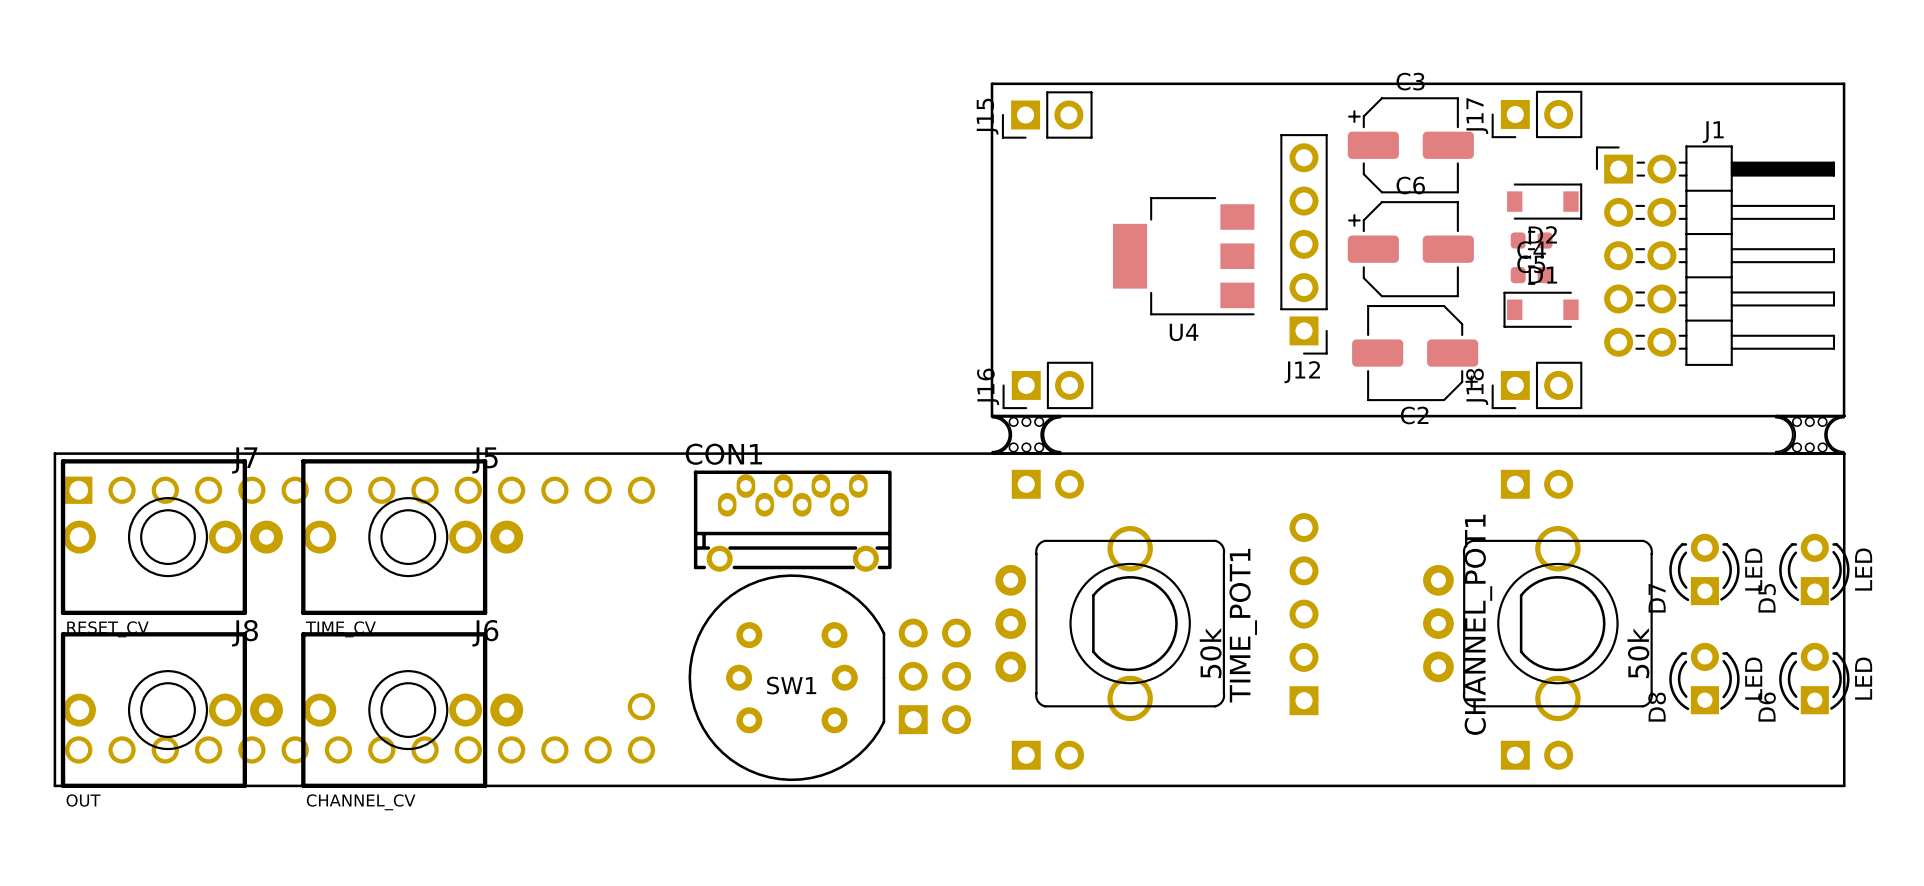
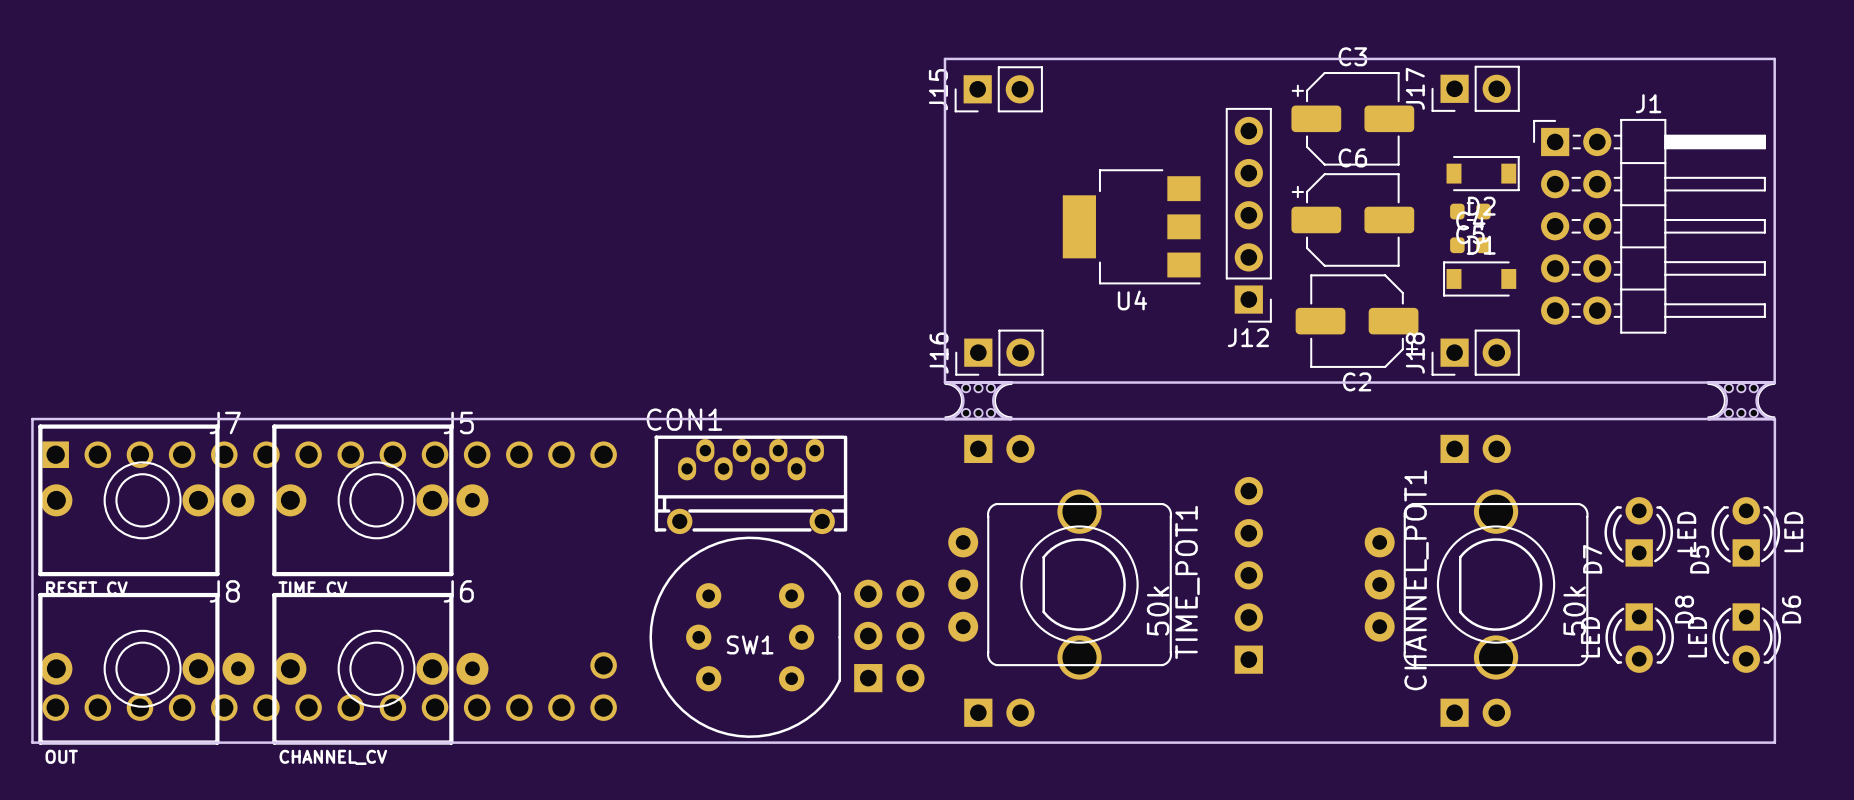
D8 rotation: 0° (1704, 678) -> 180° (1639, 638)
D6 rotation: 0° (1814, 678) -> 180° (1746, 638)

